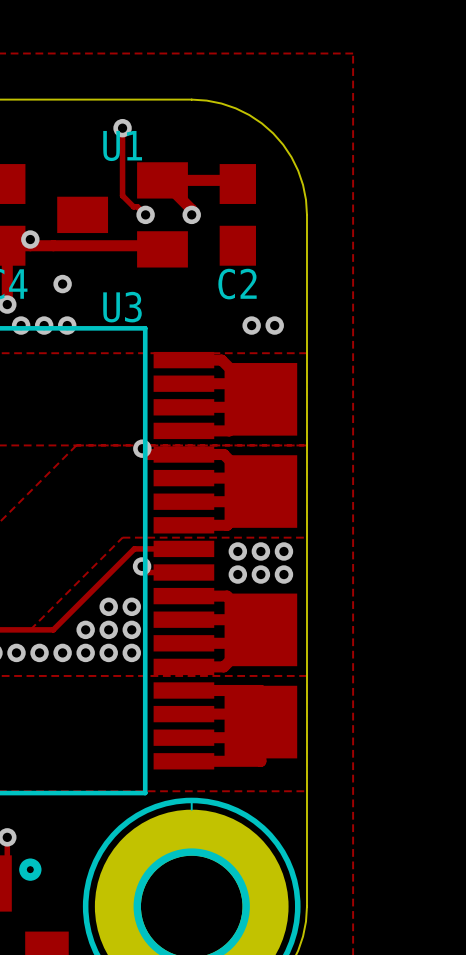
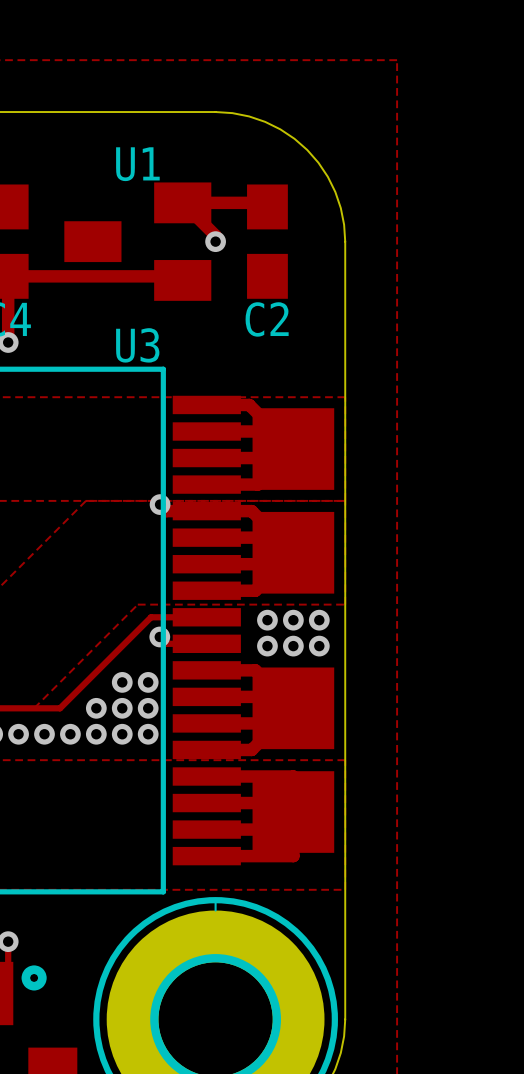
track: (122, 128) (122, 195) (145, 214) -> none
via: (122, 128) -> none
via: (145, 214) -> none
via: (30, 239) -> none
via: (62, 284) -> none
via: (21, 325) -> none
via: (44, 325) -> none
via: (67, 325) -> none
via: (251, 325) -> none
via: (274, 325) -> none

